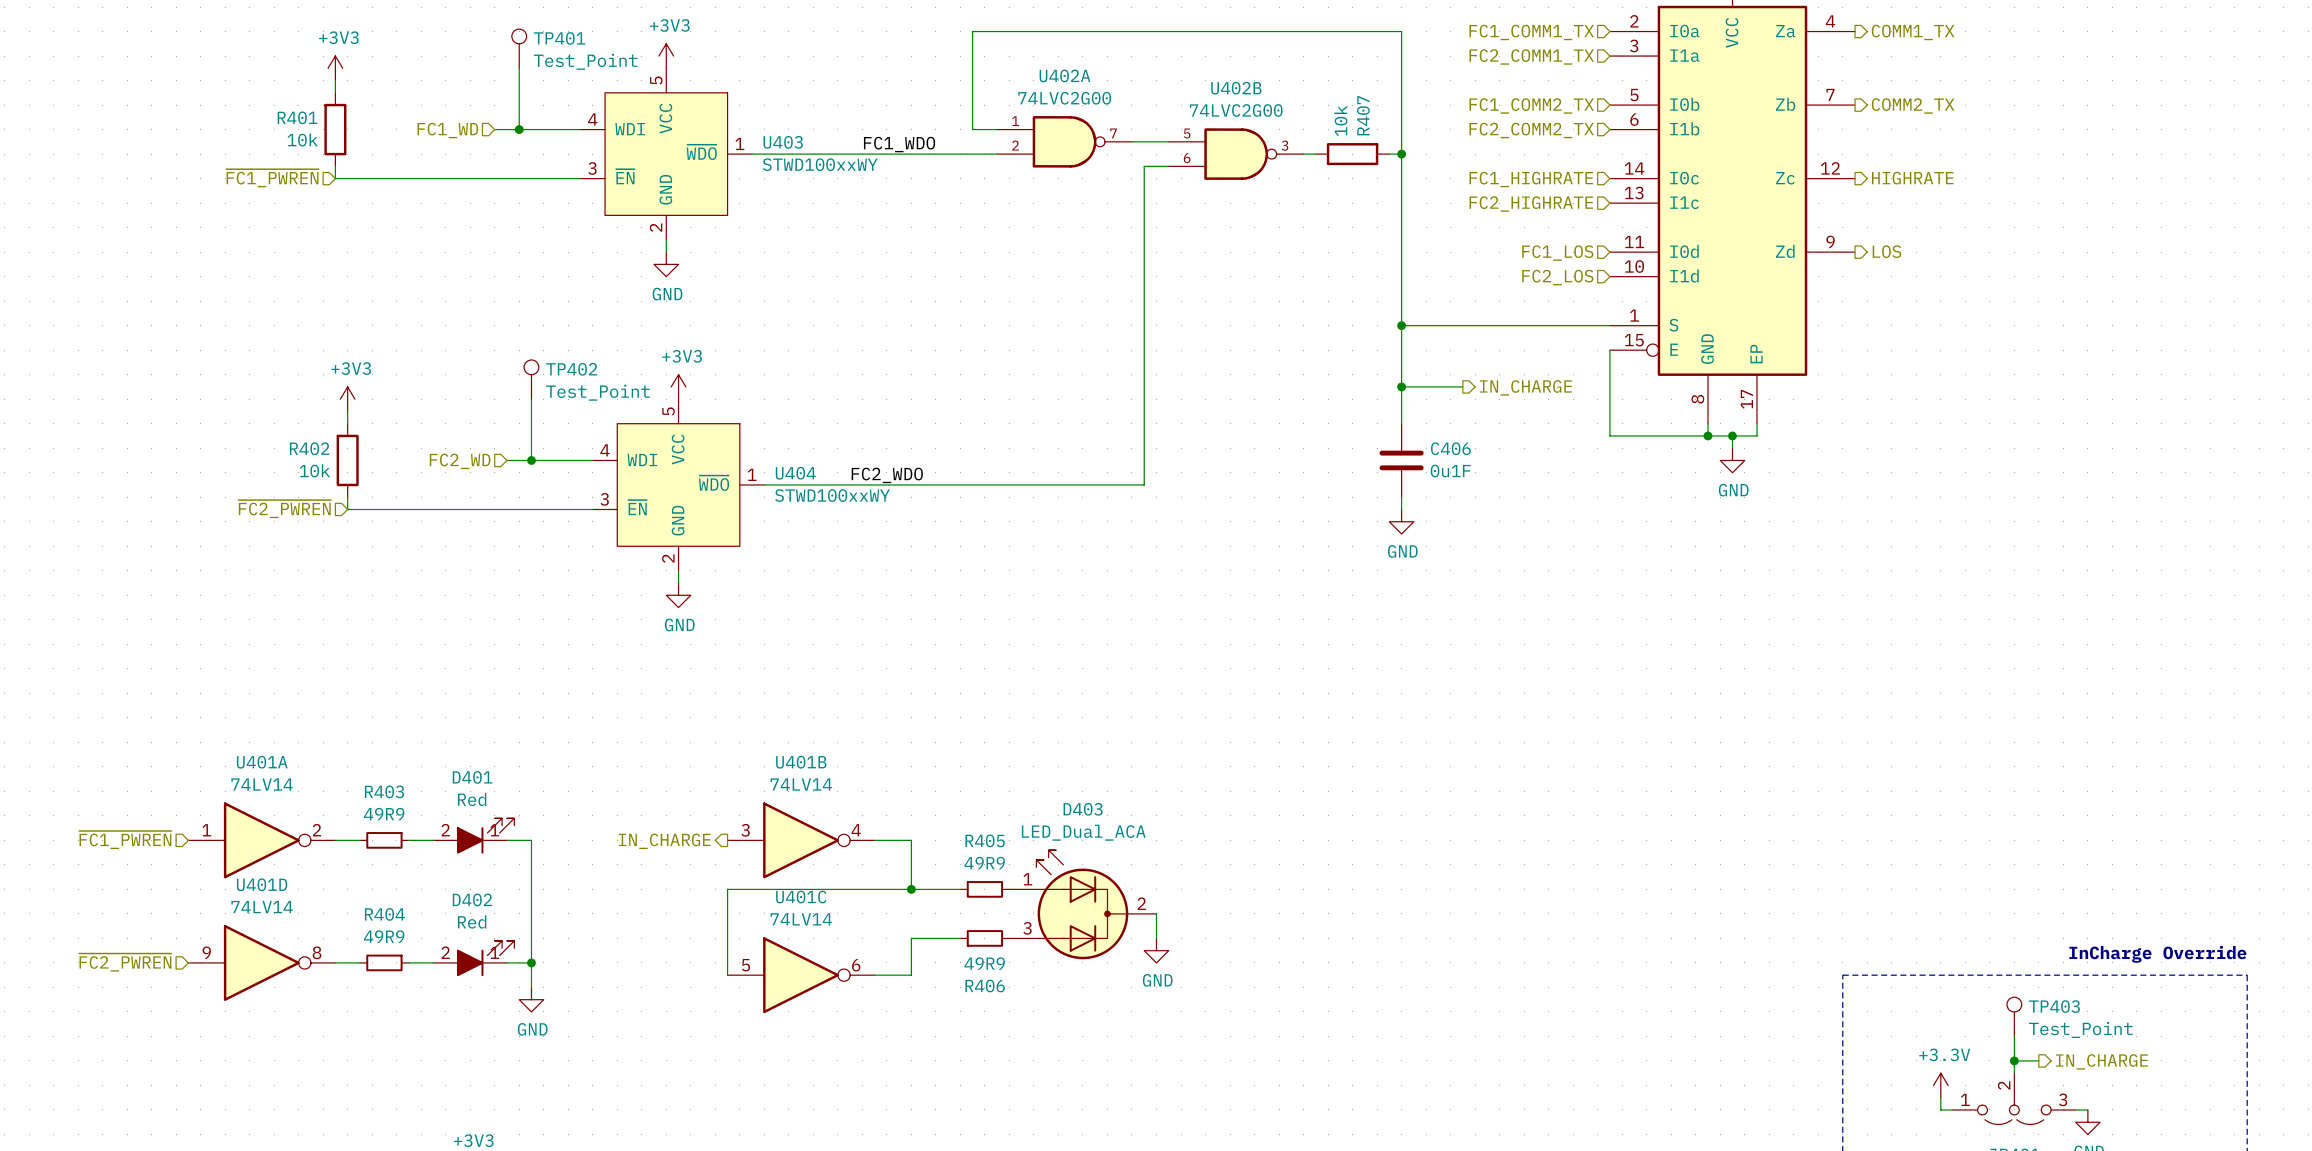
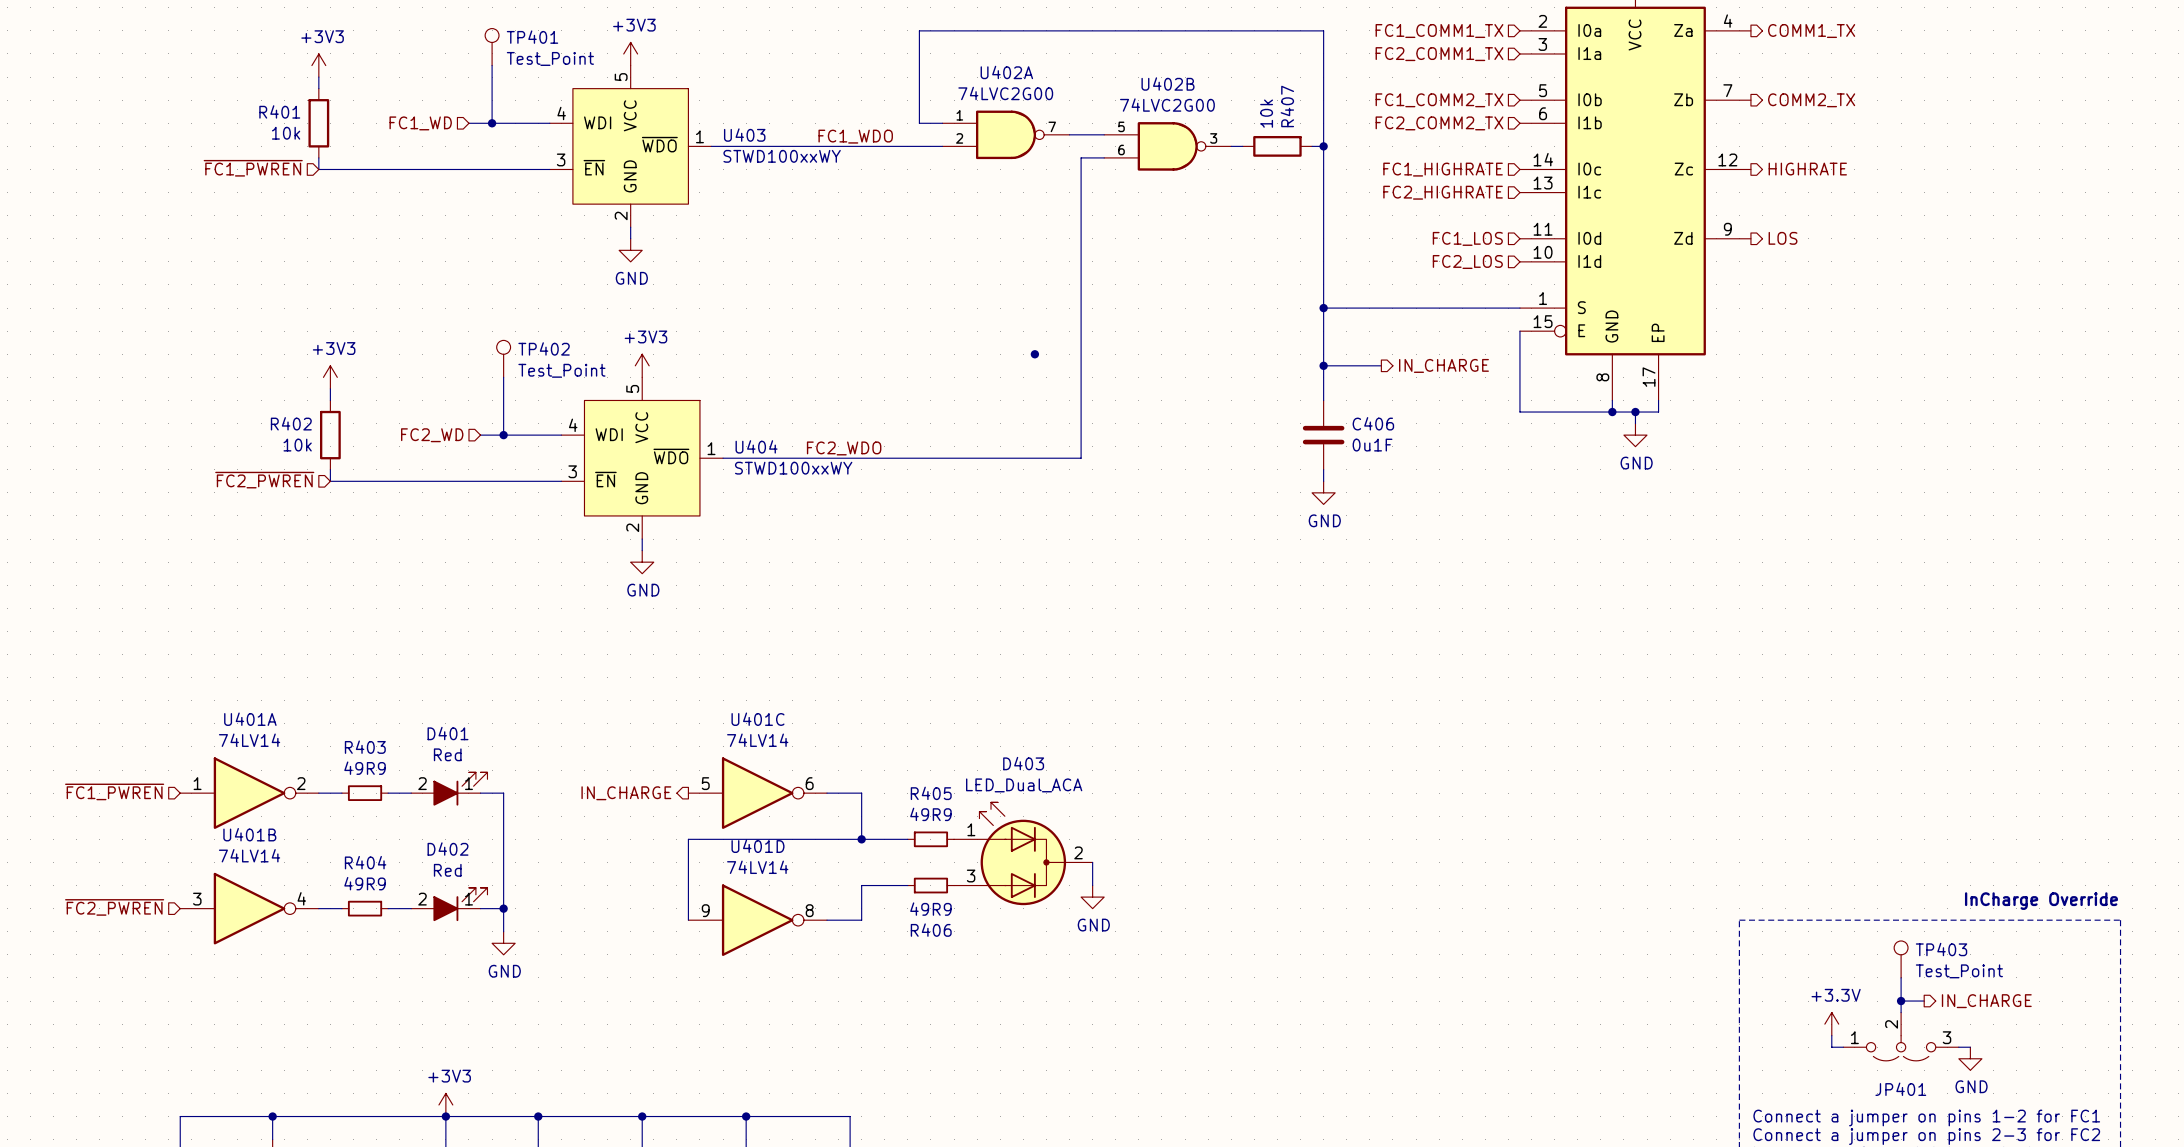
junction: none -> (1034, 354)
U401B position: (801, 840) -> (249, 908)
U401D position: (261, 962) -> (757, 920)
U401C position: (801, 975) -> (757, 793)

